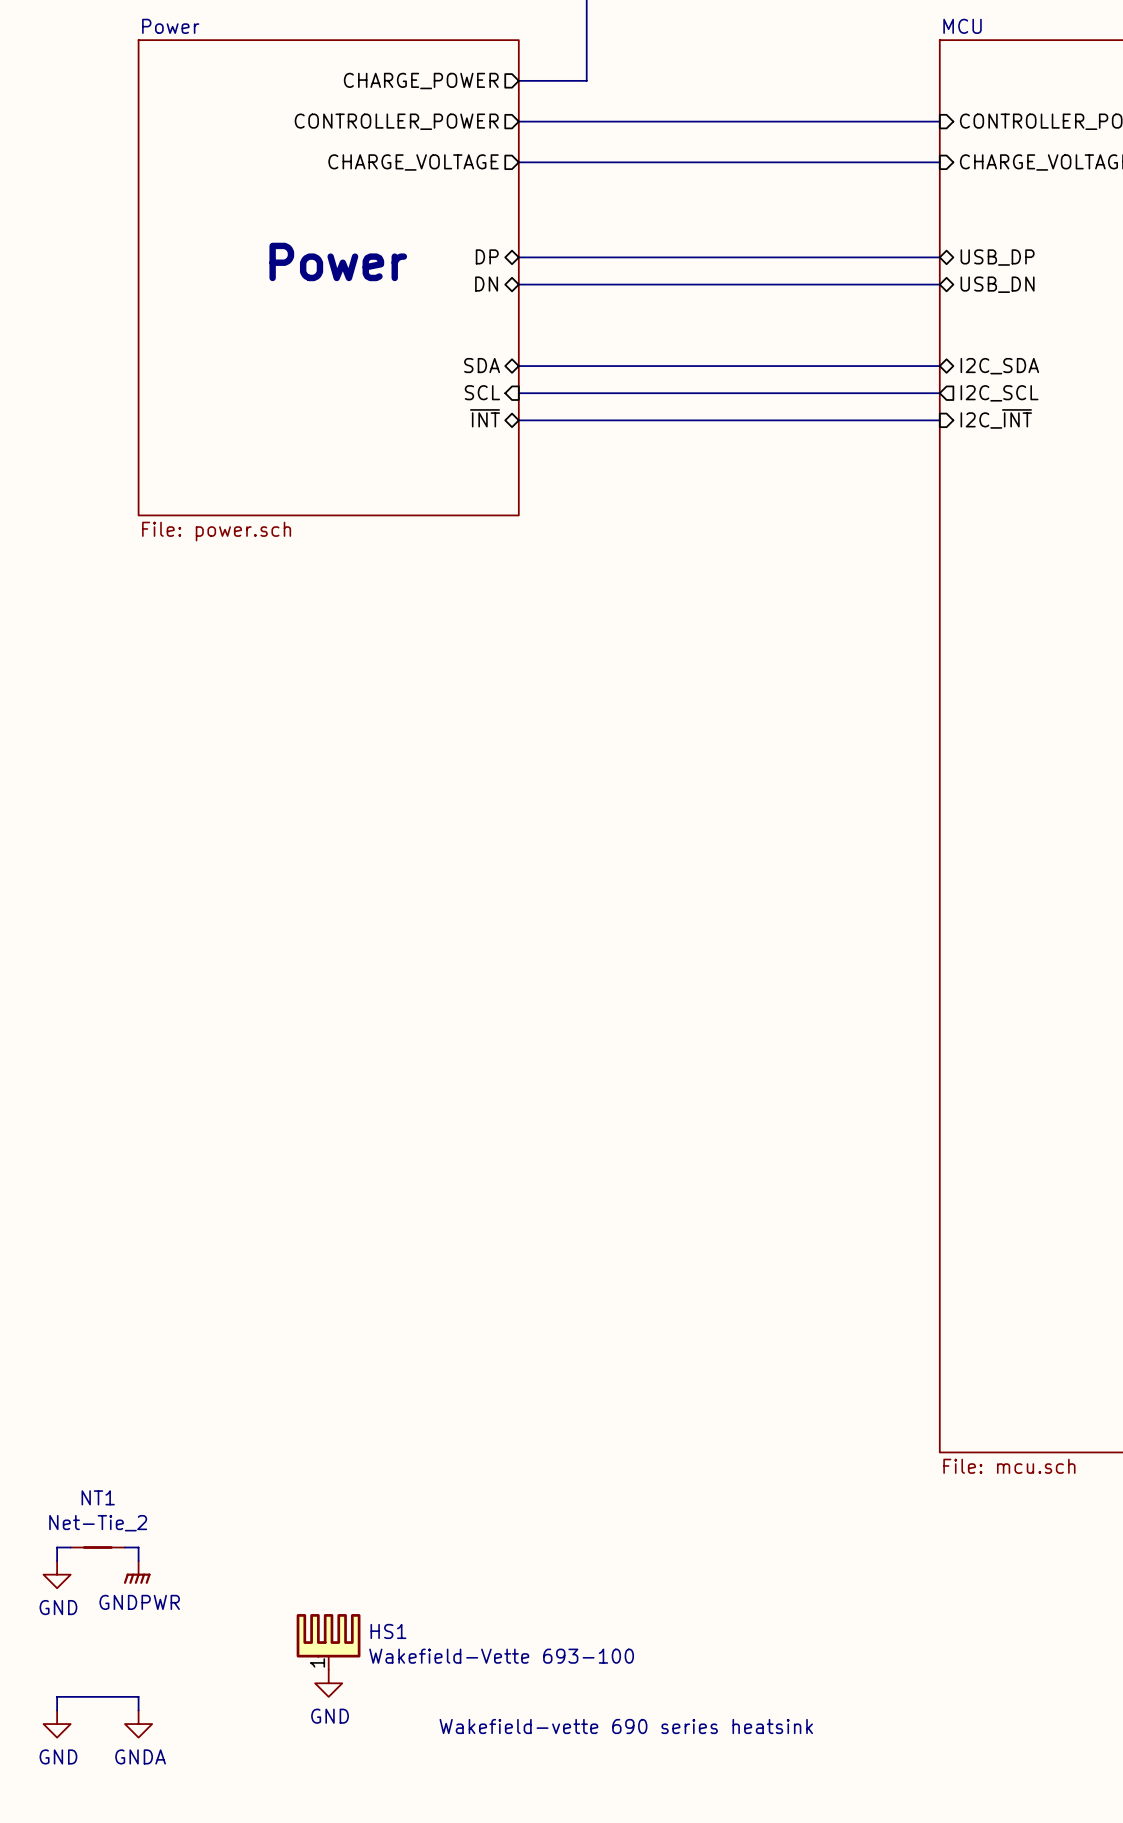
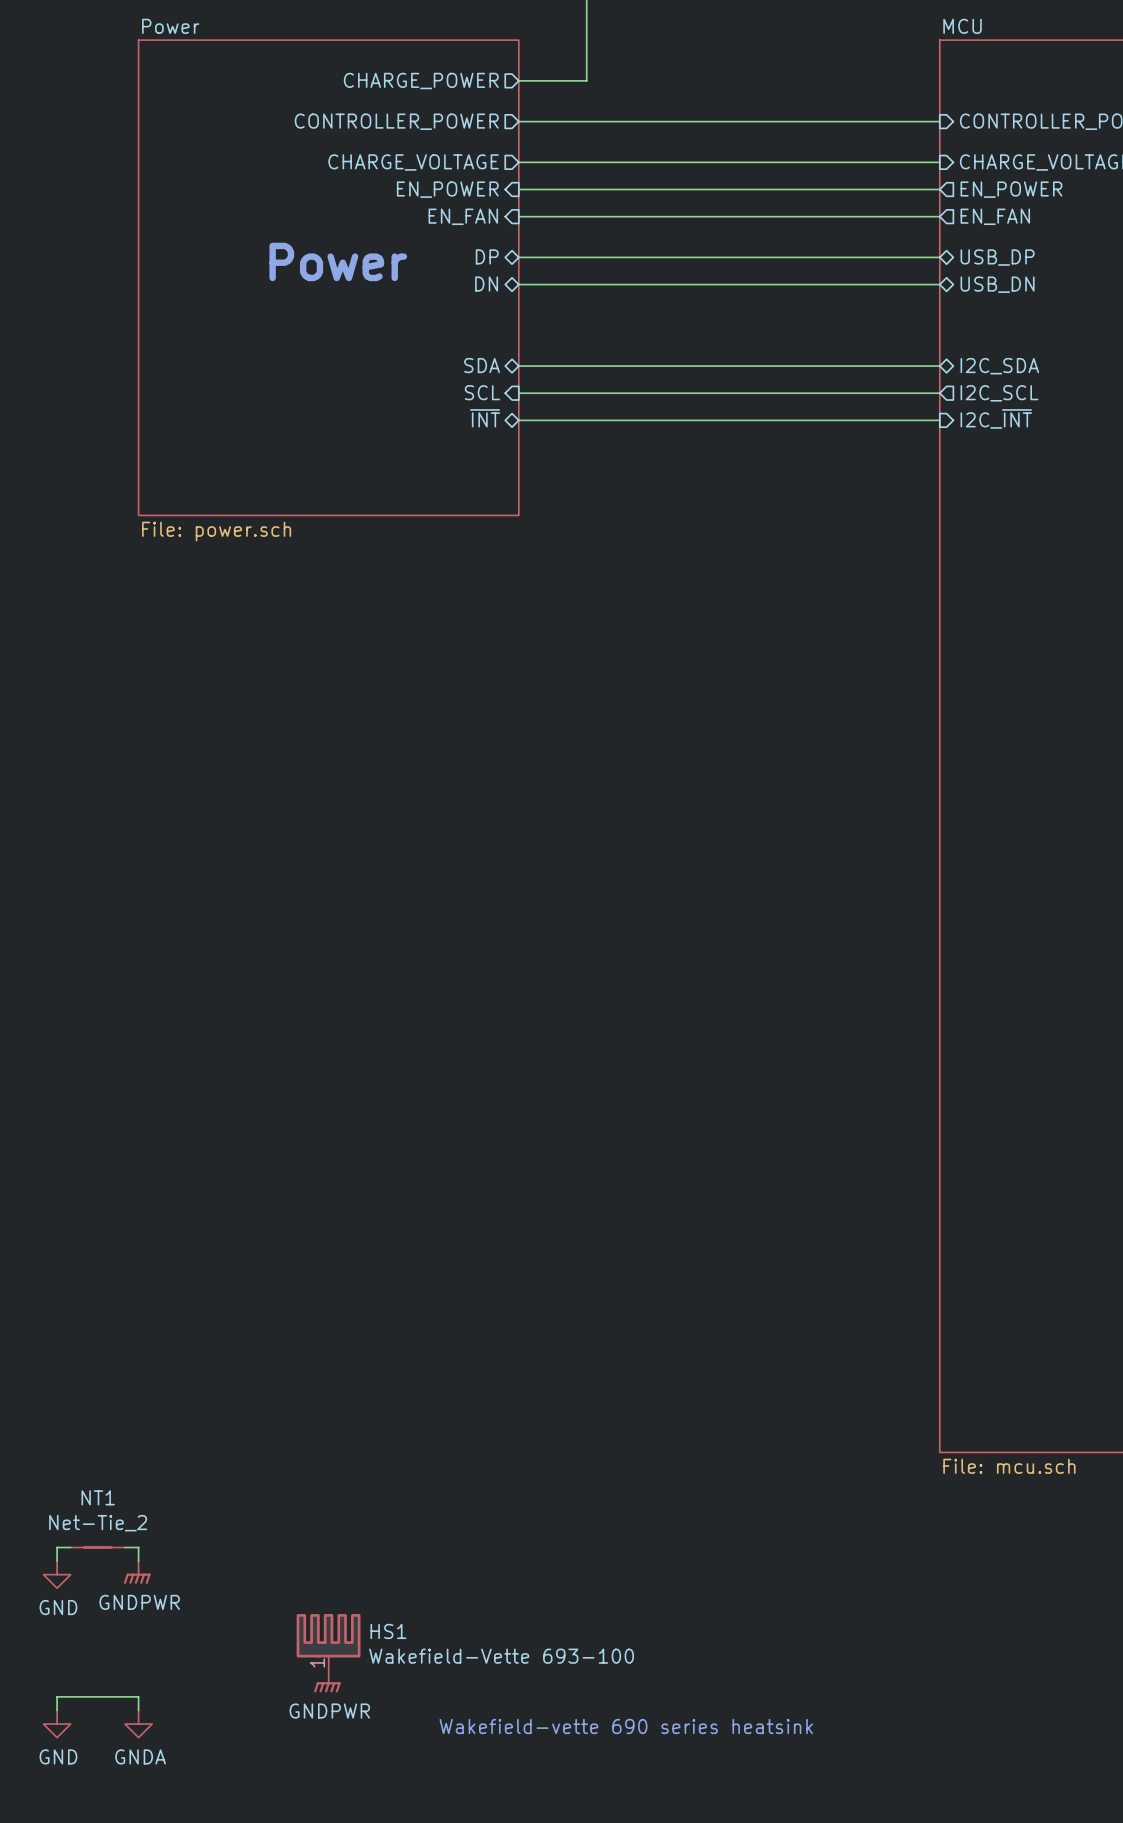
sheet pin: none -> EN_POWER (447, 189)
wire: none -> (518, 189) (939, 189)
sheet pin: none -> EN_POWER (1011, 189)
sheet pin: none -> EN_FAN (463, 216)
wire: none -> (518, 216) (939, 216)
sheet pin: none -> EN_FAN (995, 216)
power symbol: GND (328, 1683) -> GNDPWR (327, 1681)

